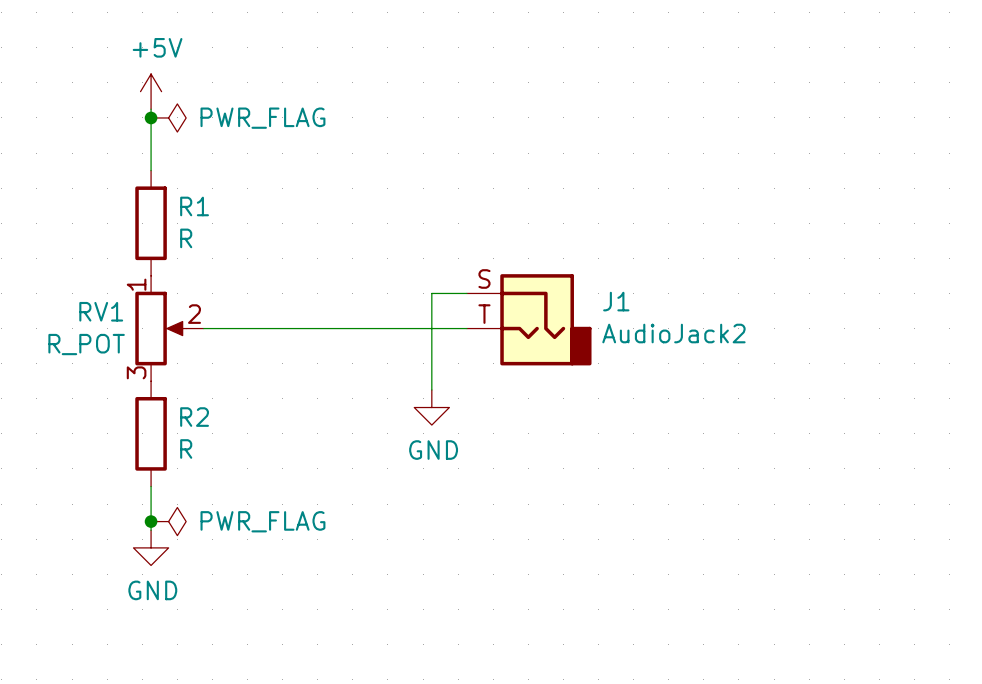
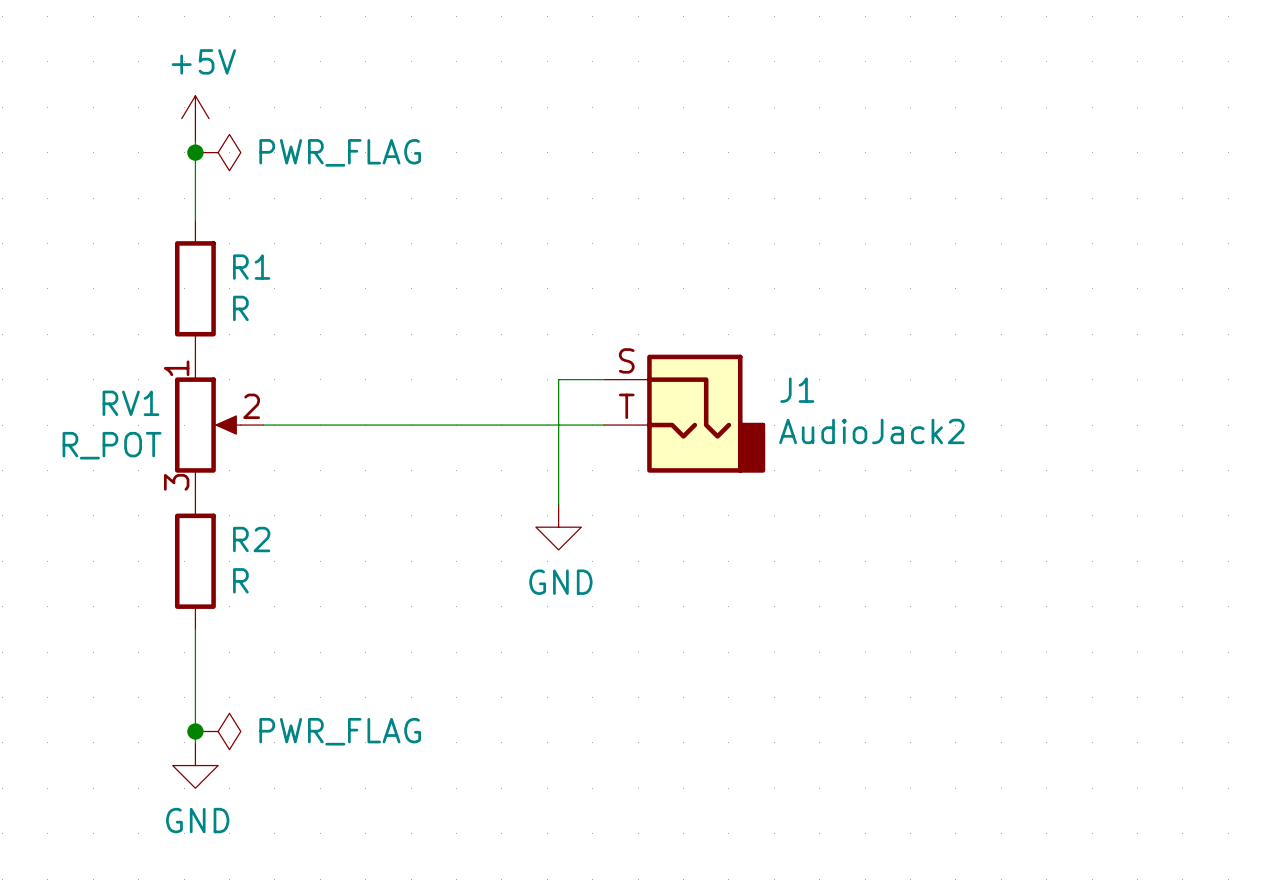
junction position: (151, 521) -> (195, 731)
power symbol position: PWR_FLAG (168, 521) -> PWR_FLAG (218, 731)
wire: none -> (195, 686) (195, 742)
power symbol position: GND (151, 547) -> GND (195, 765)

